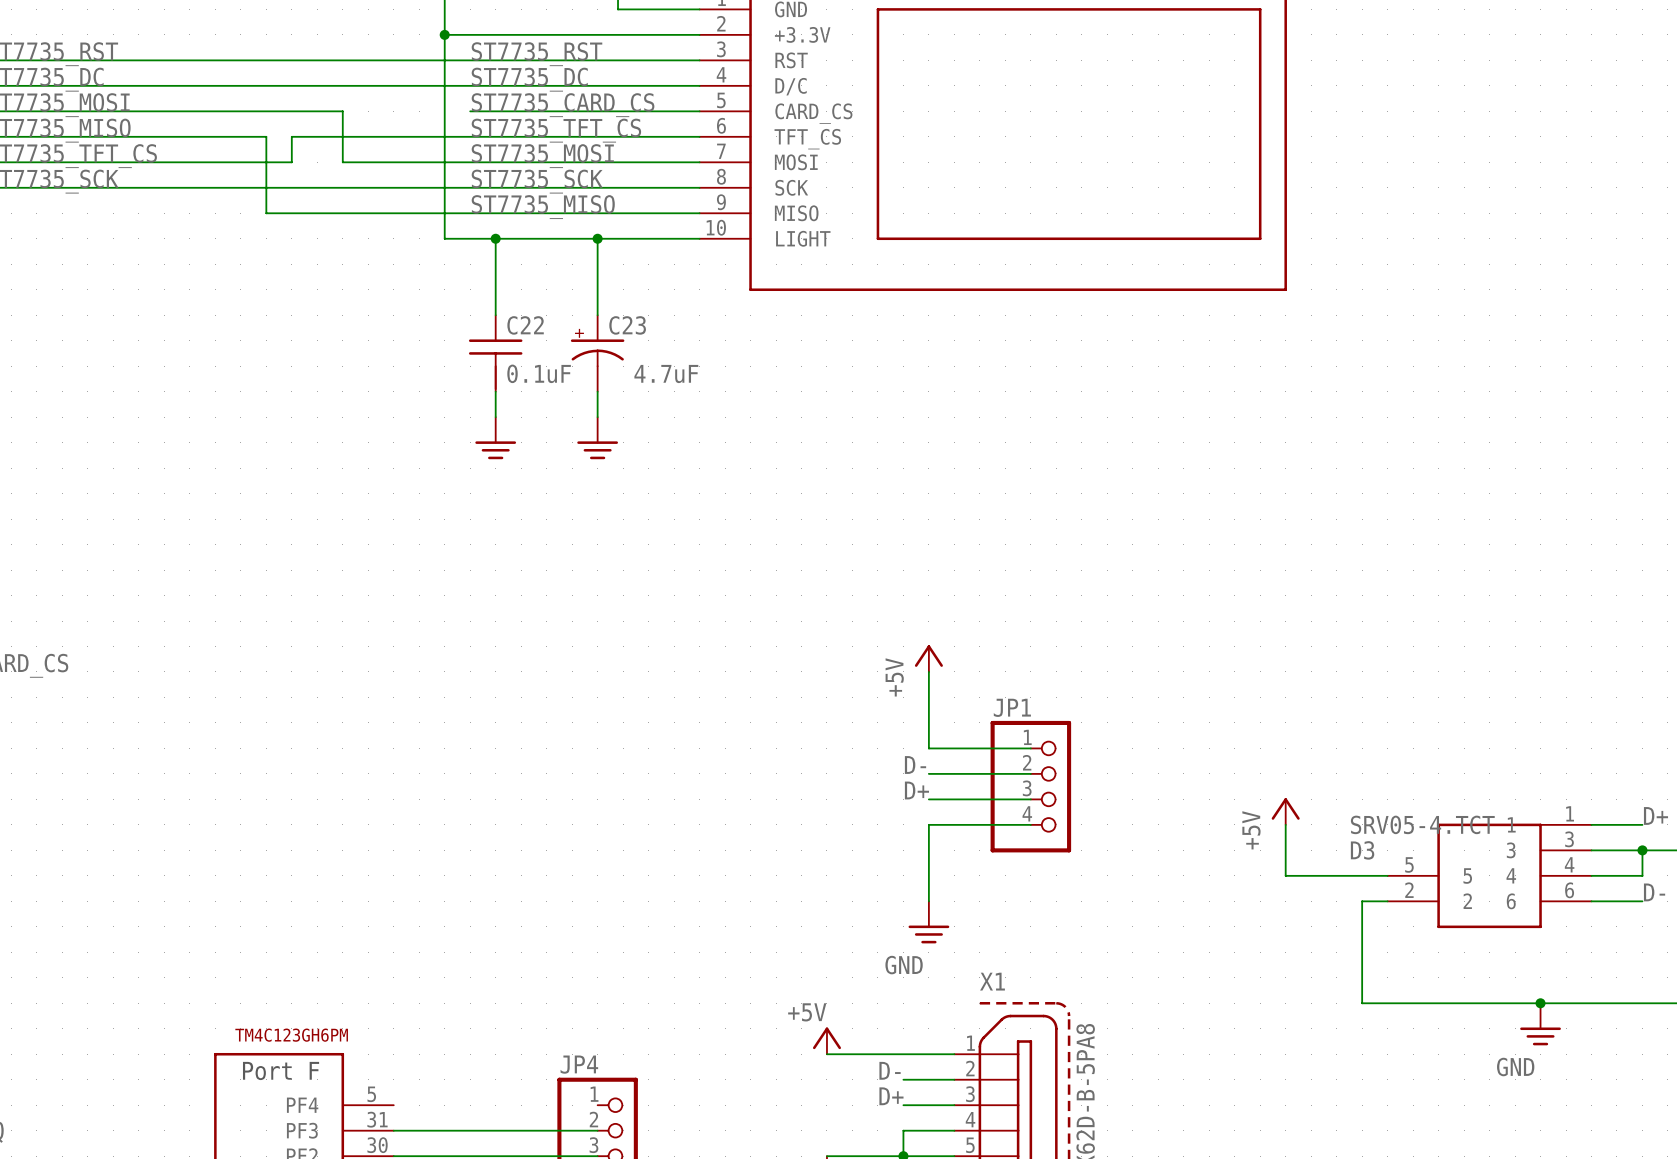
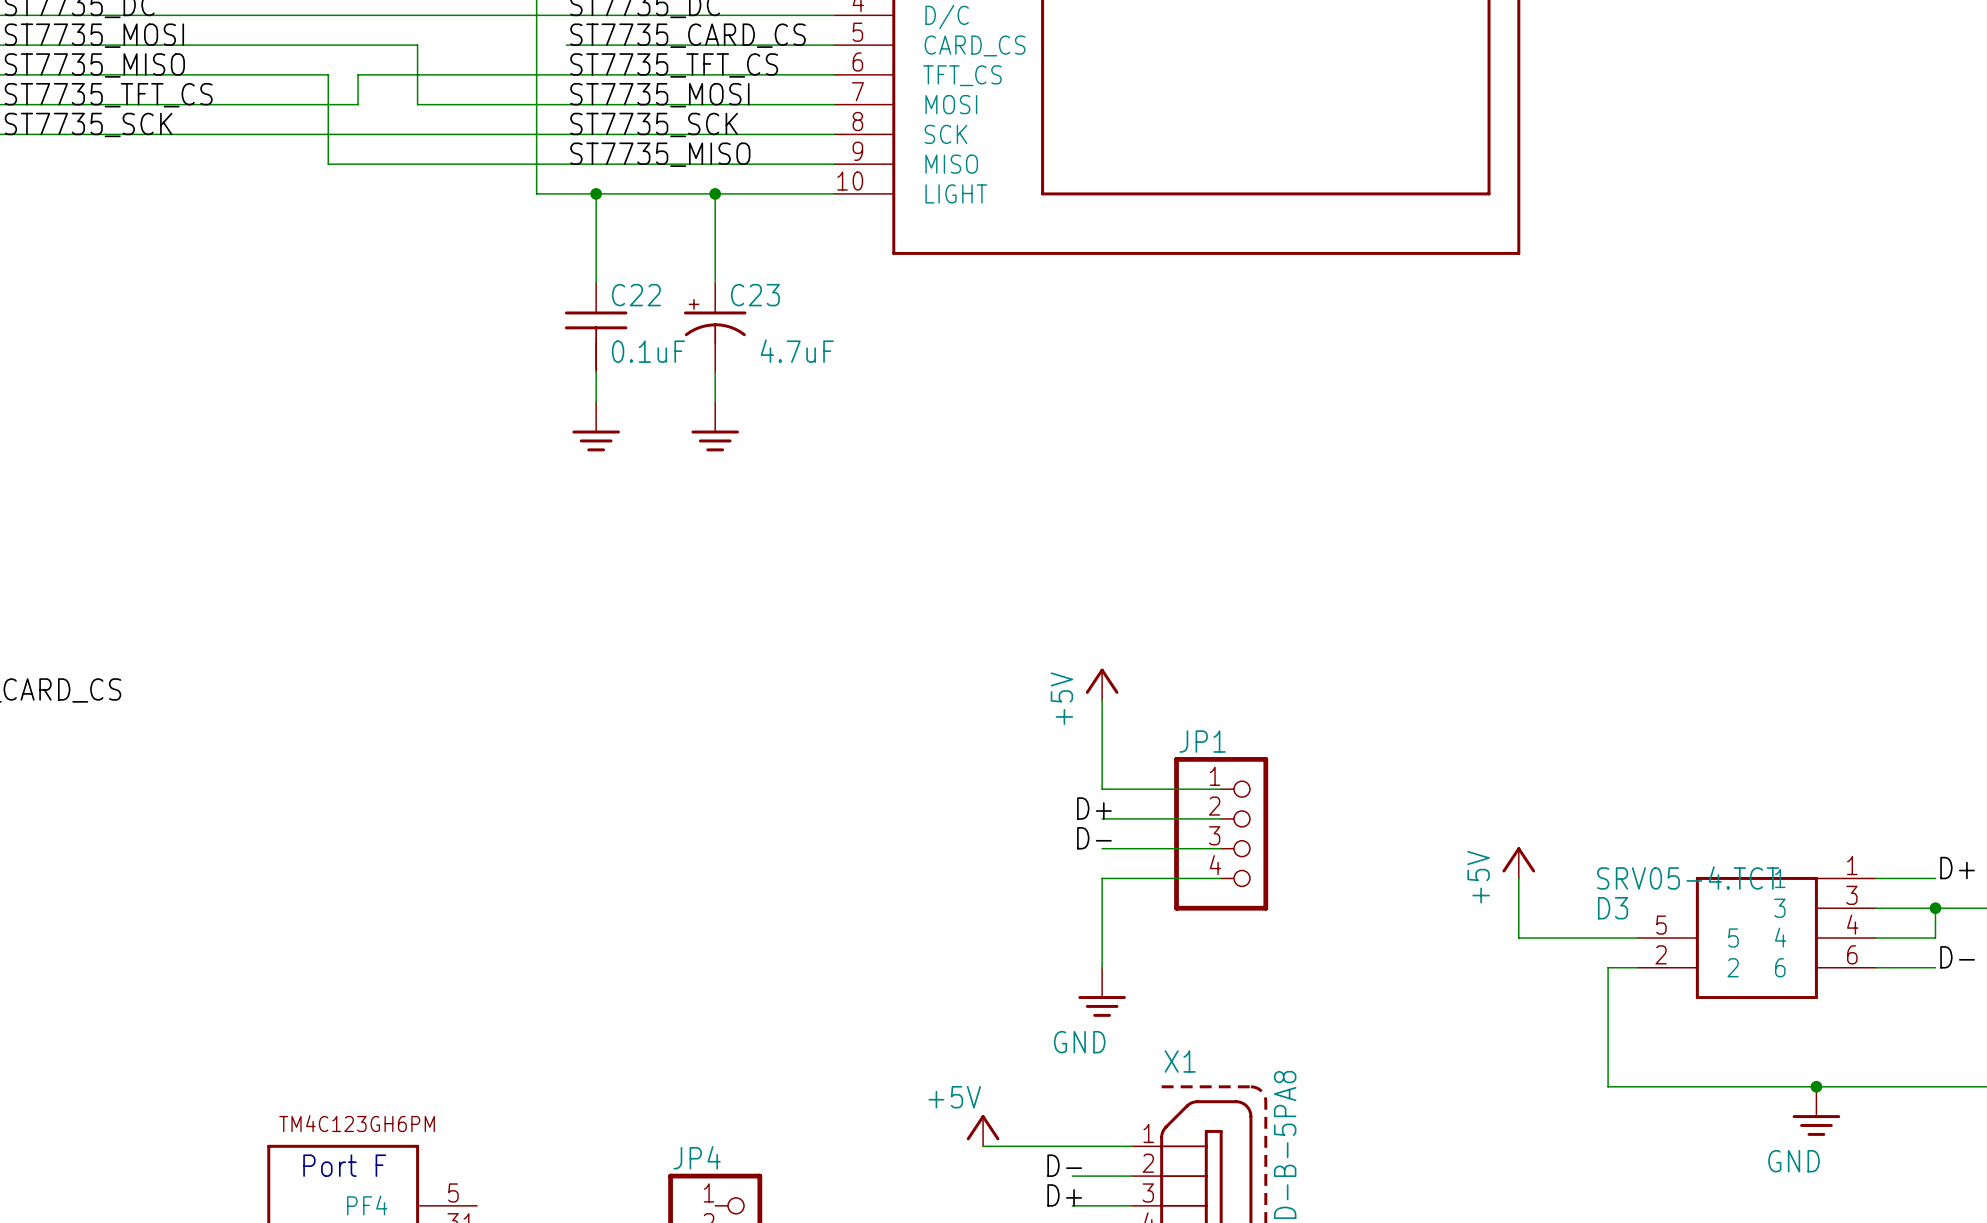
label: D- (915, 765) -> D+ (1094, 808)
label: D+ (916, 790) -> D- (1094, 838)

